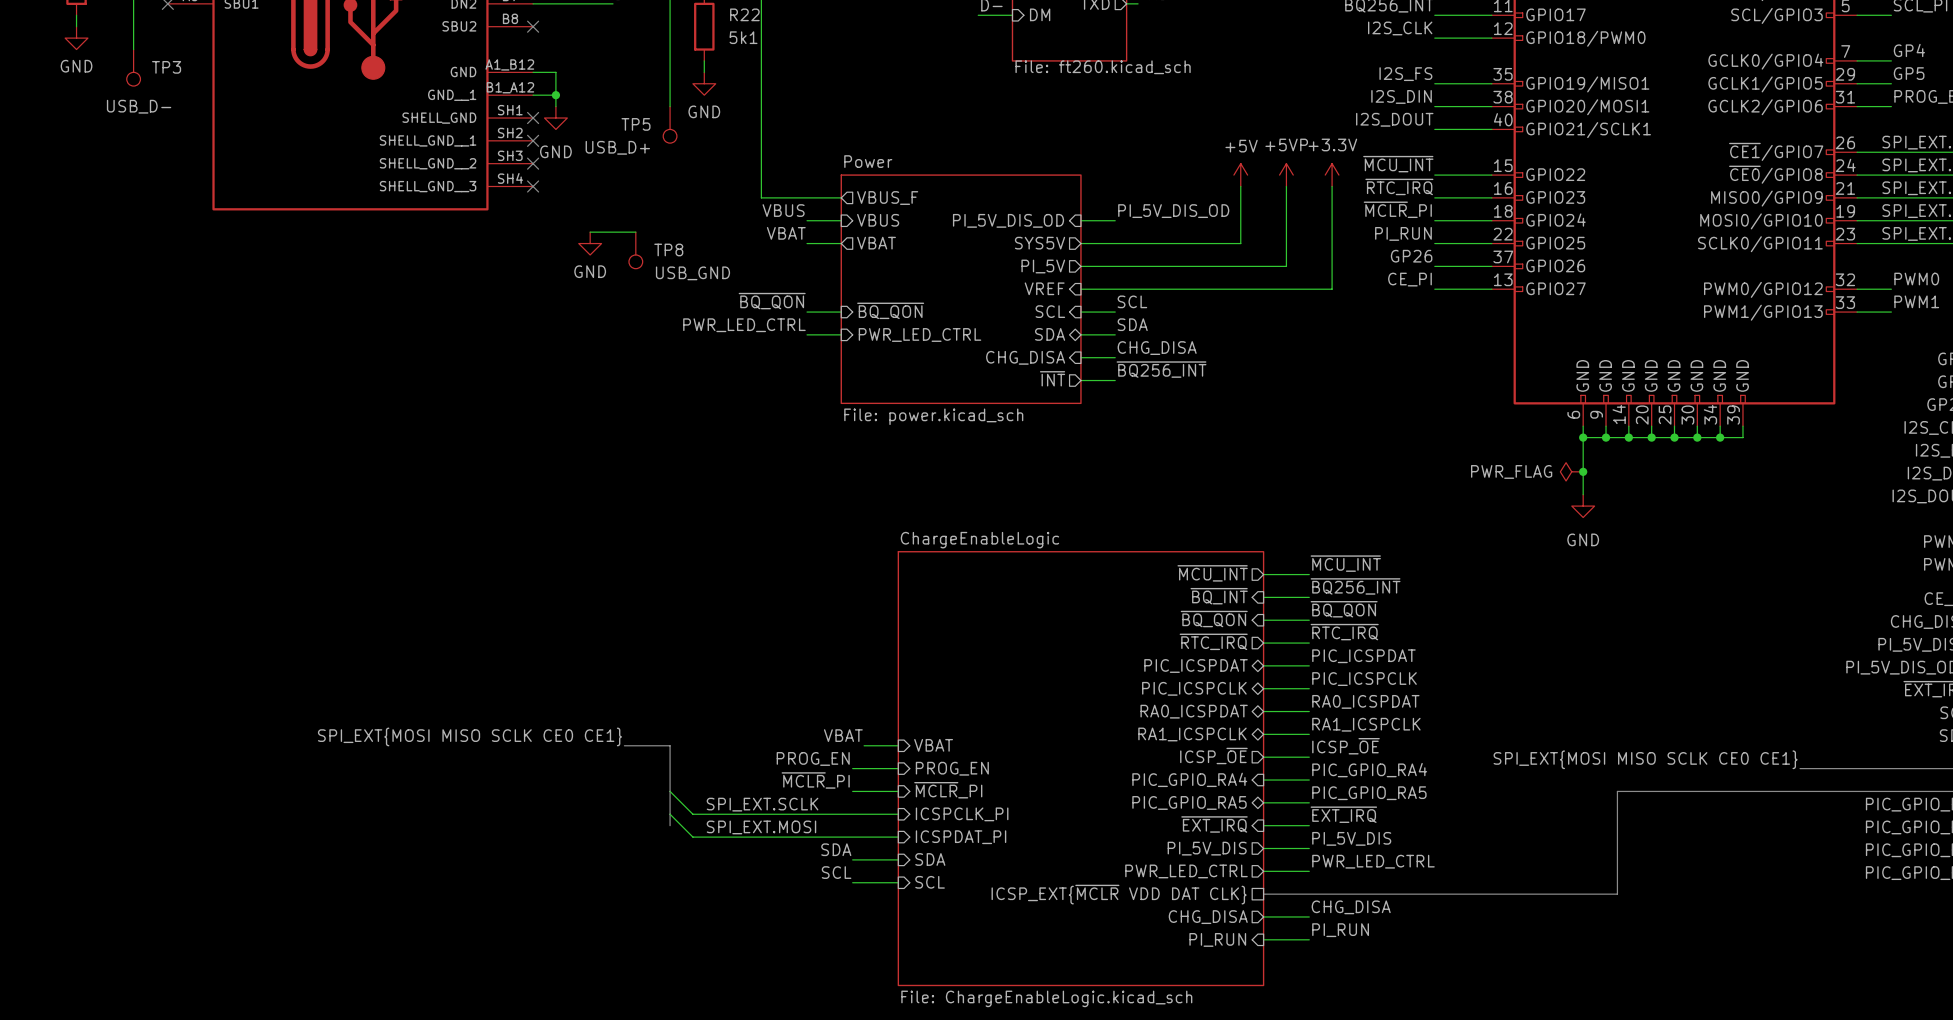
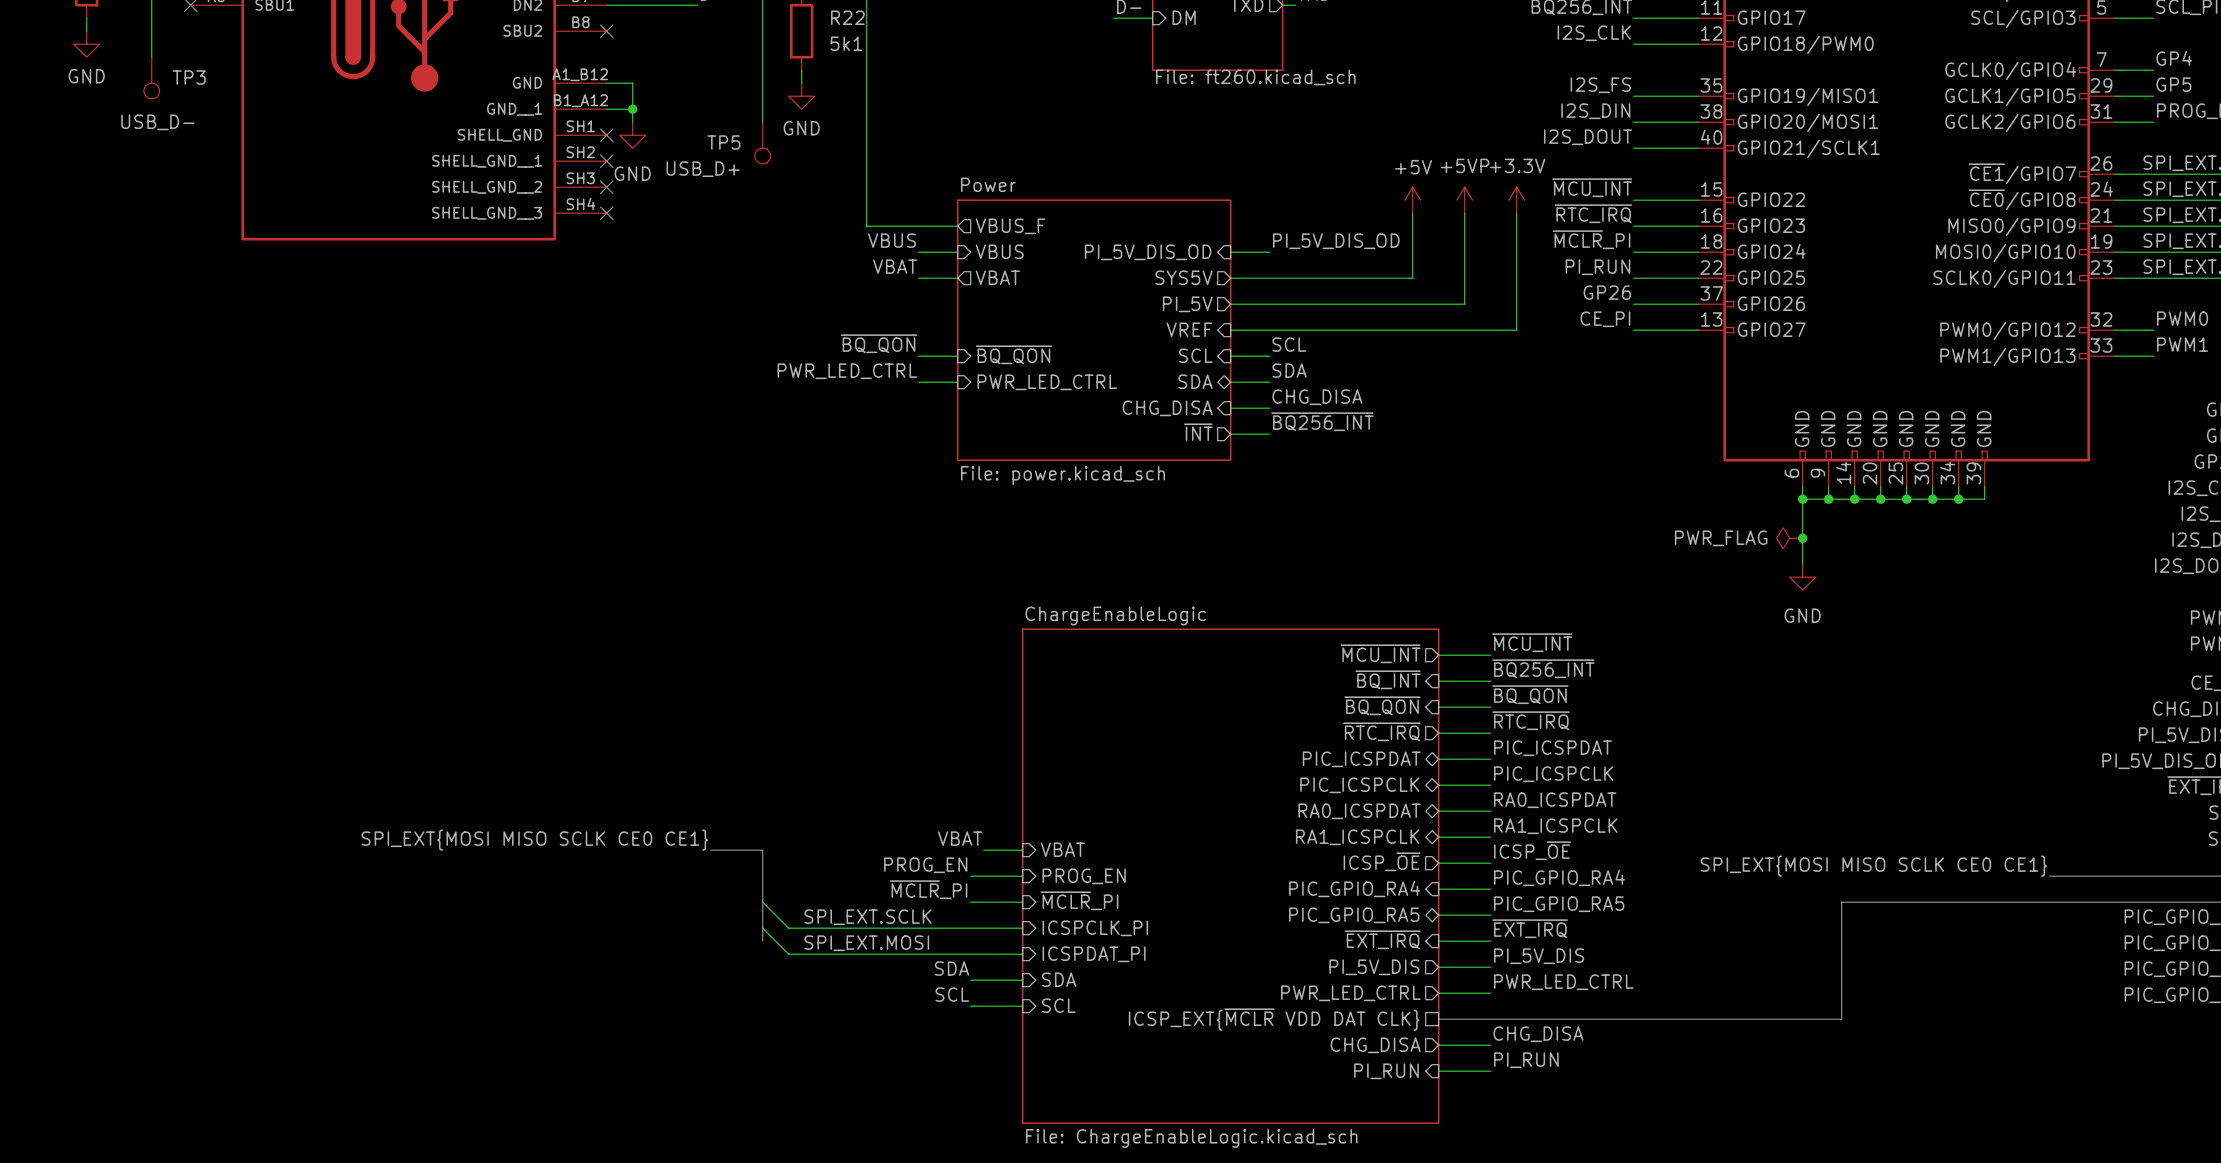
wire: (590, 232) (635, 232) -> none
power symbol: GND (590, 243) -> none
TP8: USB_GND (635, 250) -> none

